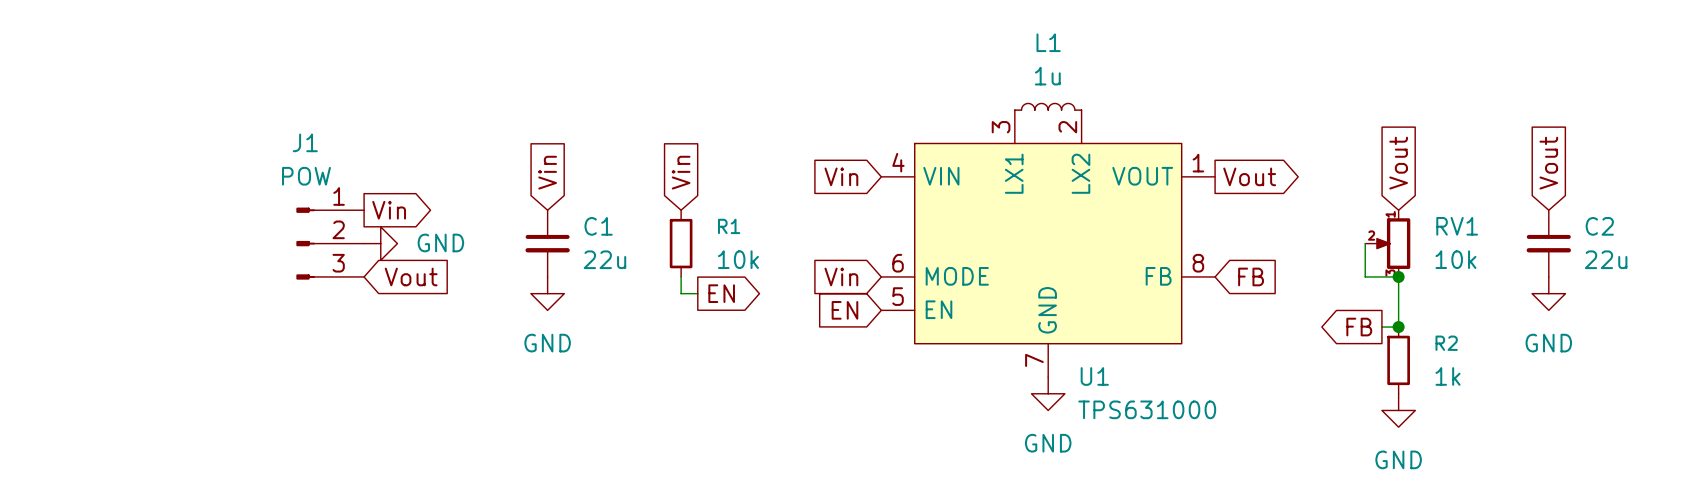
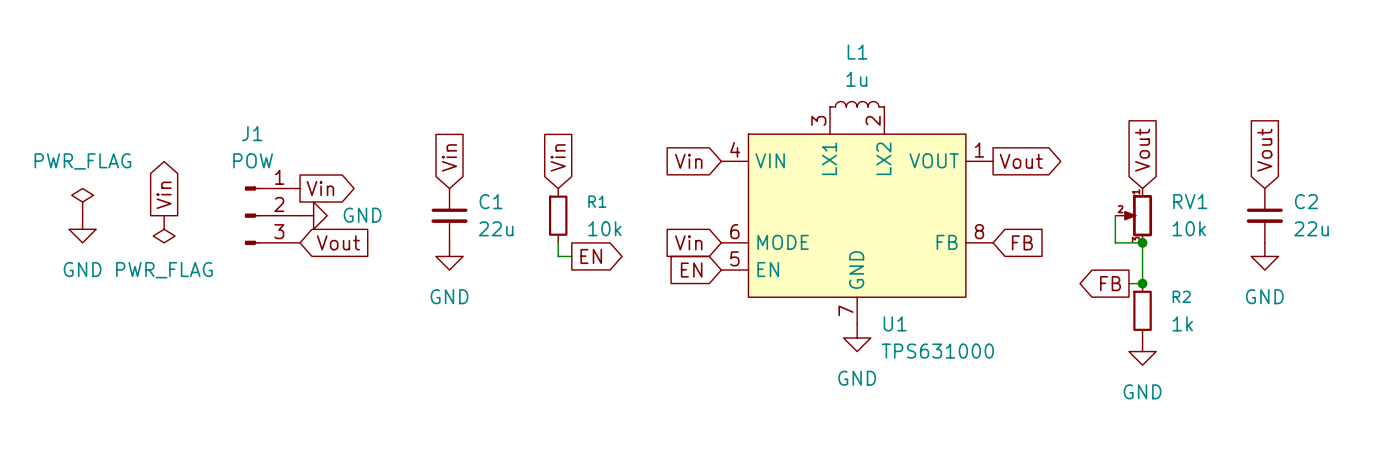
global label: none -> Vin (164, 195)
power symbol: none -> PWR_FLAG (82, 202)
power symbol: none -> GND (82, 229)
power symbol: none -> PWR_FLAG (164, 229)

